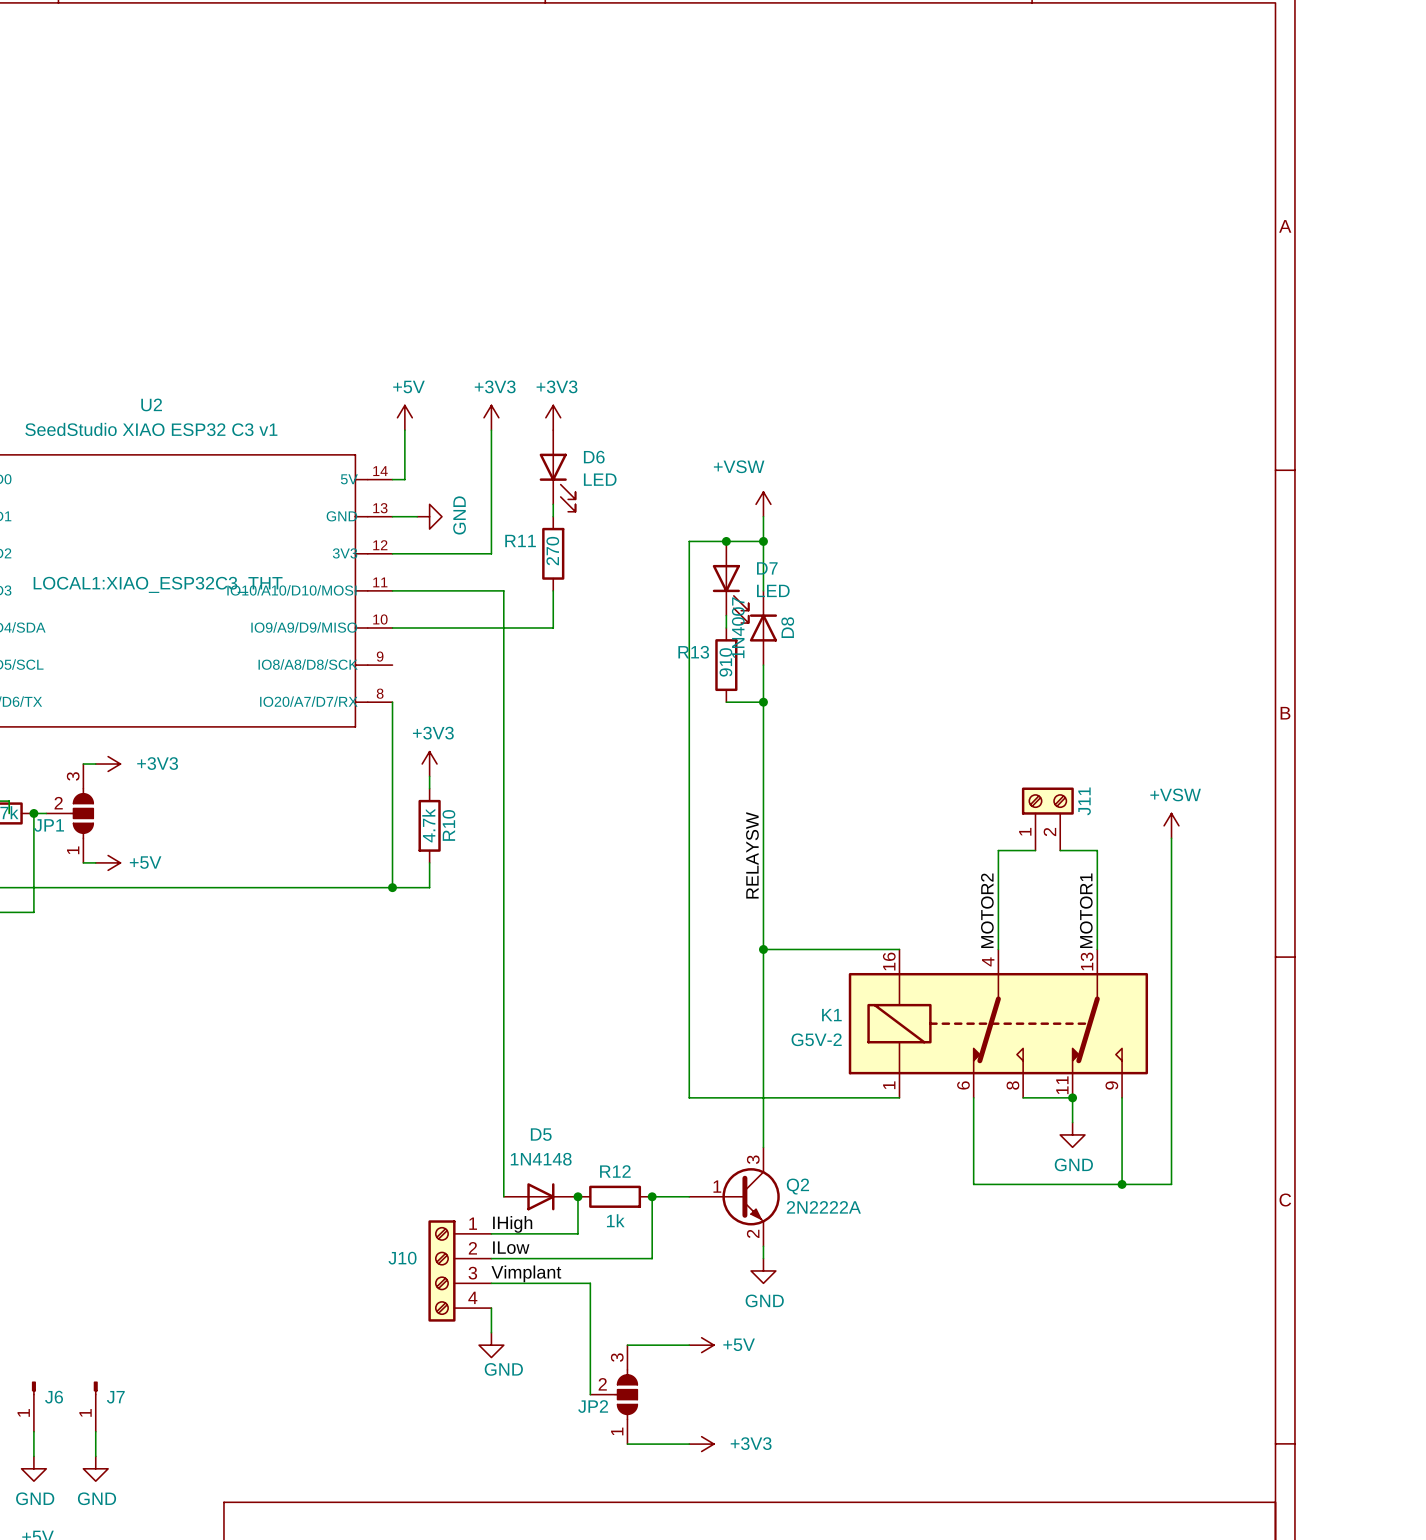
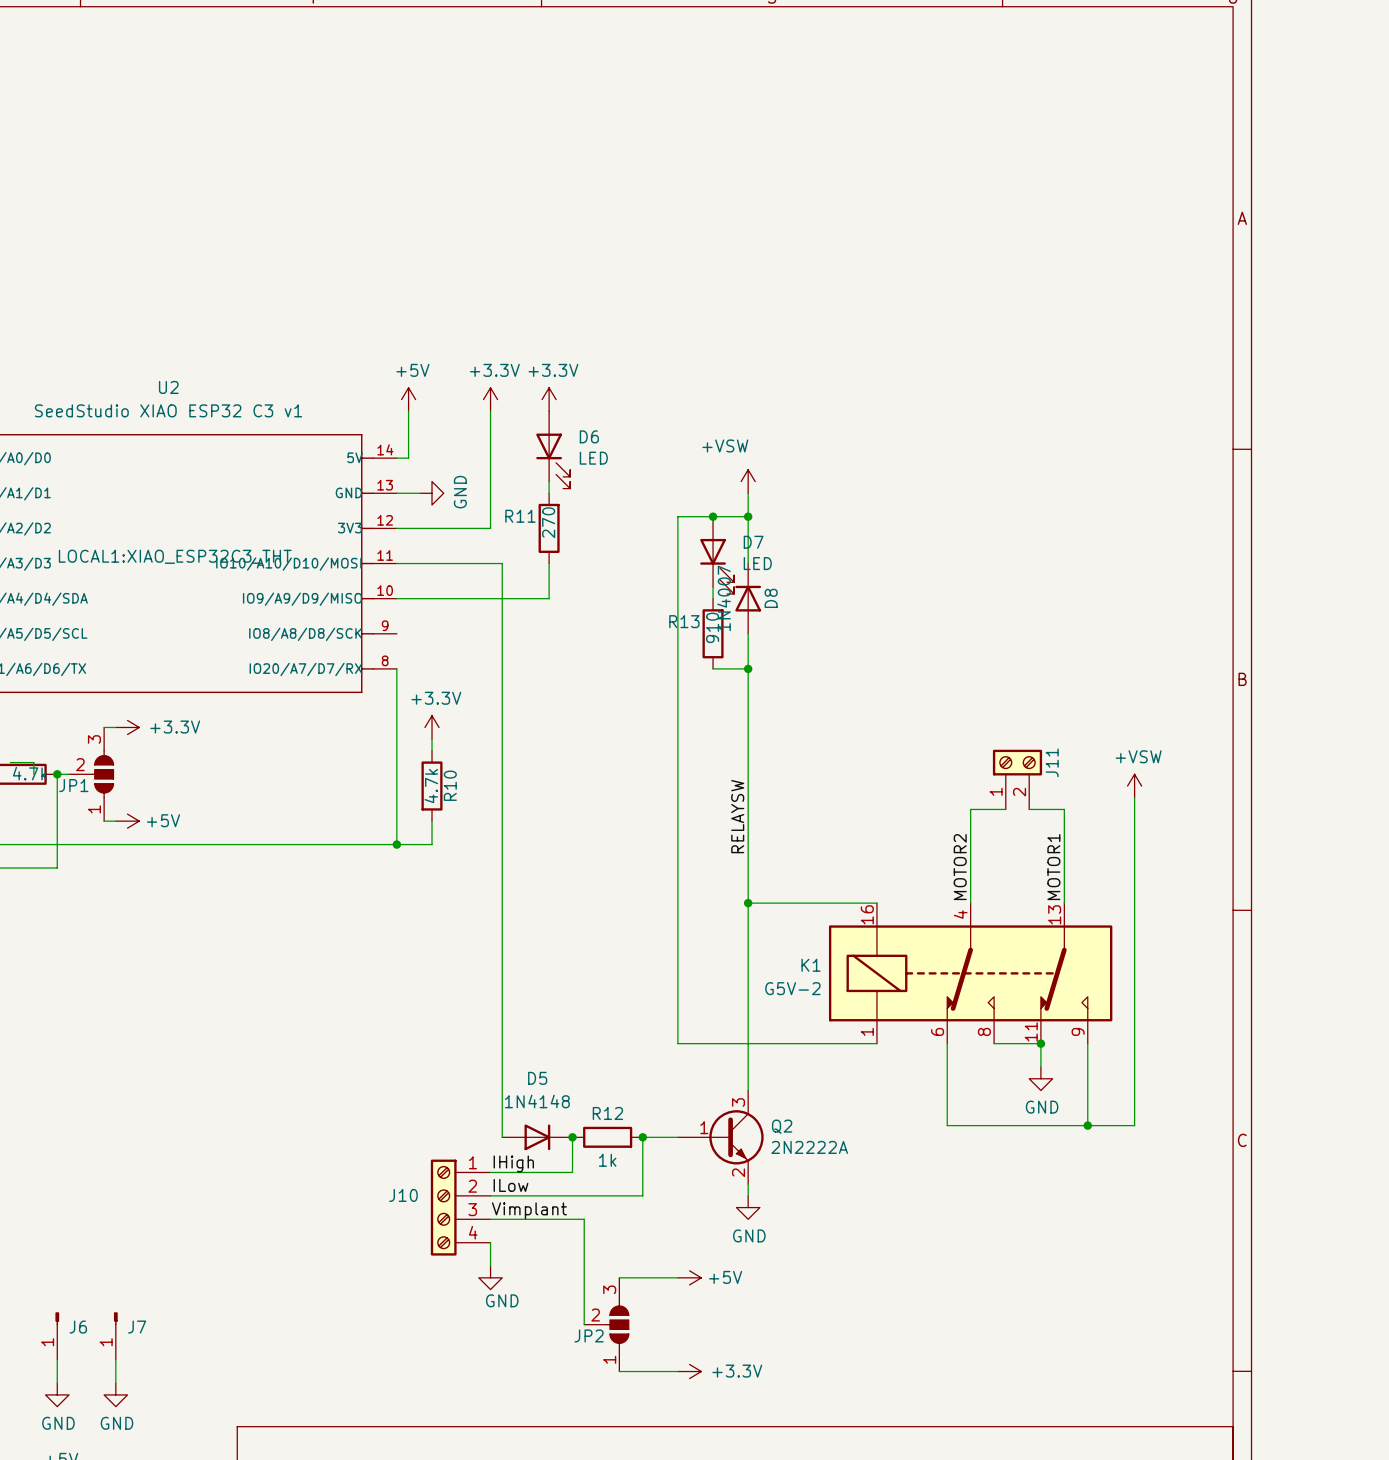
power symbol: +3V3 (491, 417) -> +3.3V (490, 399)
power symbol: +3V3 (553, 417) -> +3.3V (549, 399)
power symbol: +3V3 (108, 764) -> +3.3V (127, 727)
power symbol: +3V3 (429, 764) -> +3.3V (432, 727)
power symbol: +3V3 (701, 1444) -> +3.3V (689, 1371)

